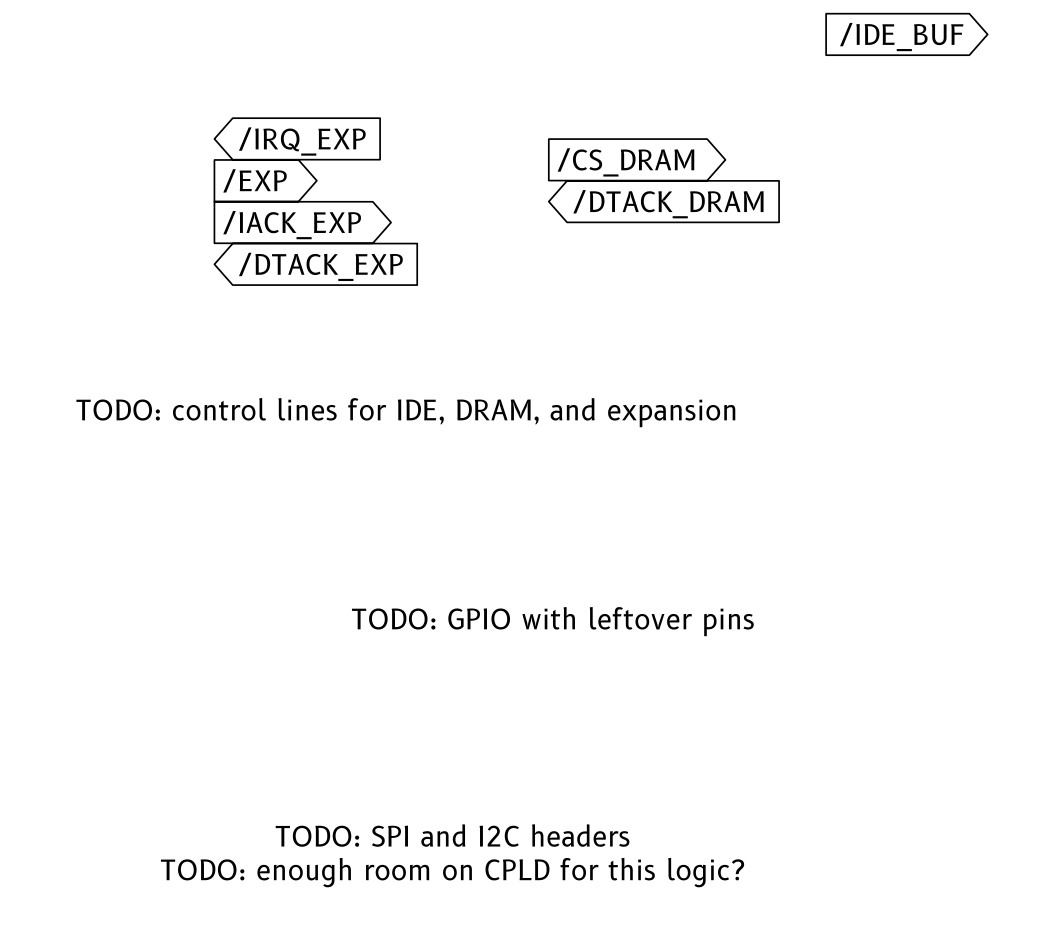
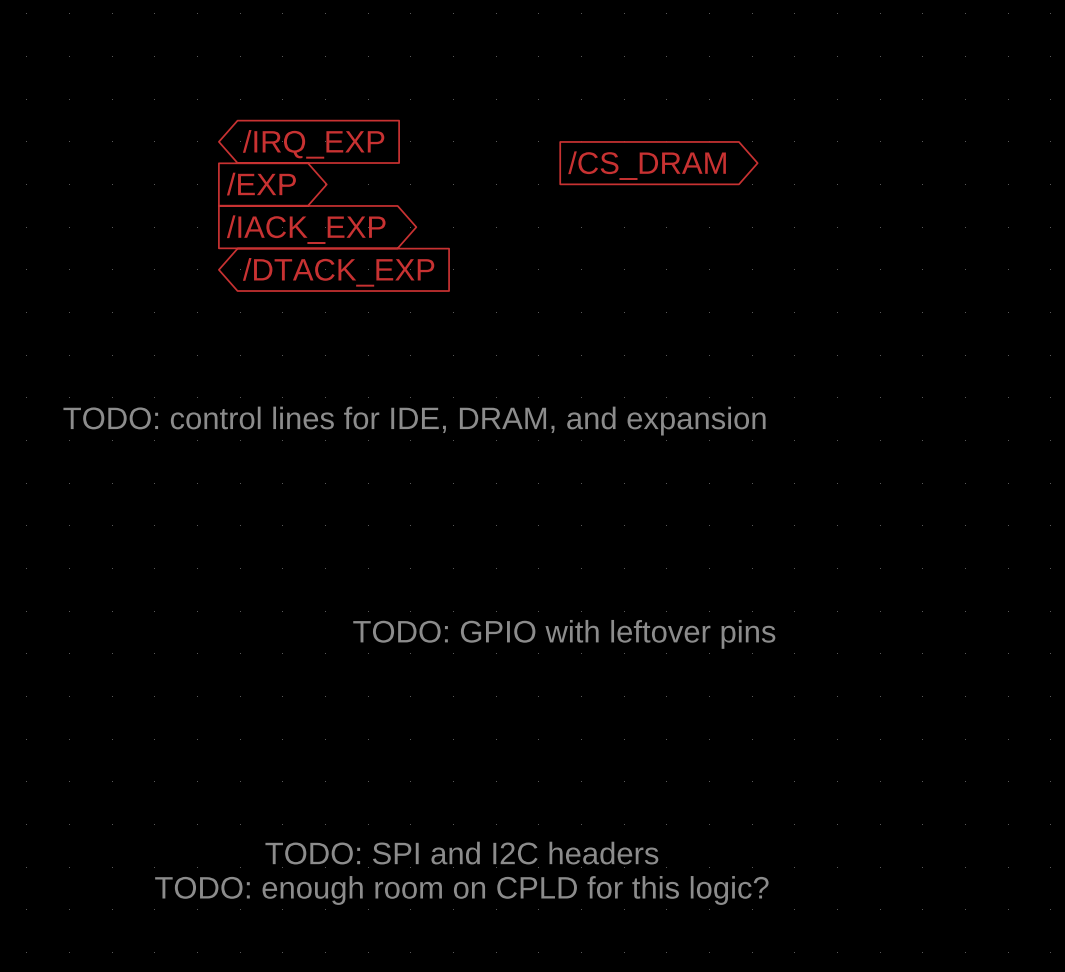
global label: /IDE_BUF (901, 37) -> none
global label: /DTACK_DRAM (668, 204) -> none

